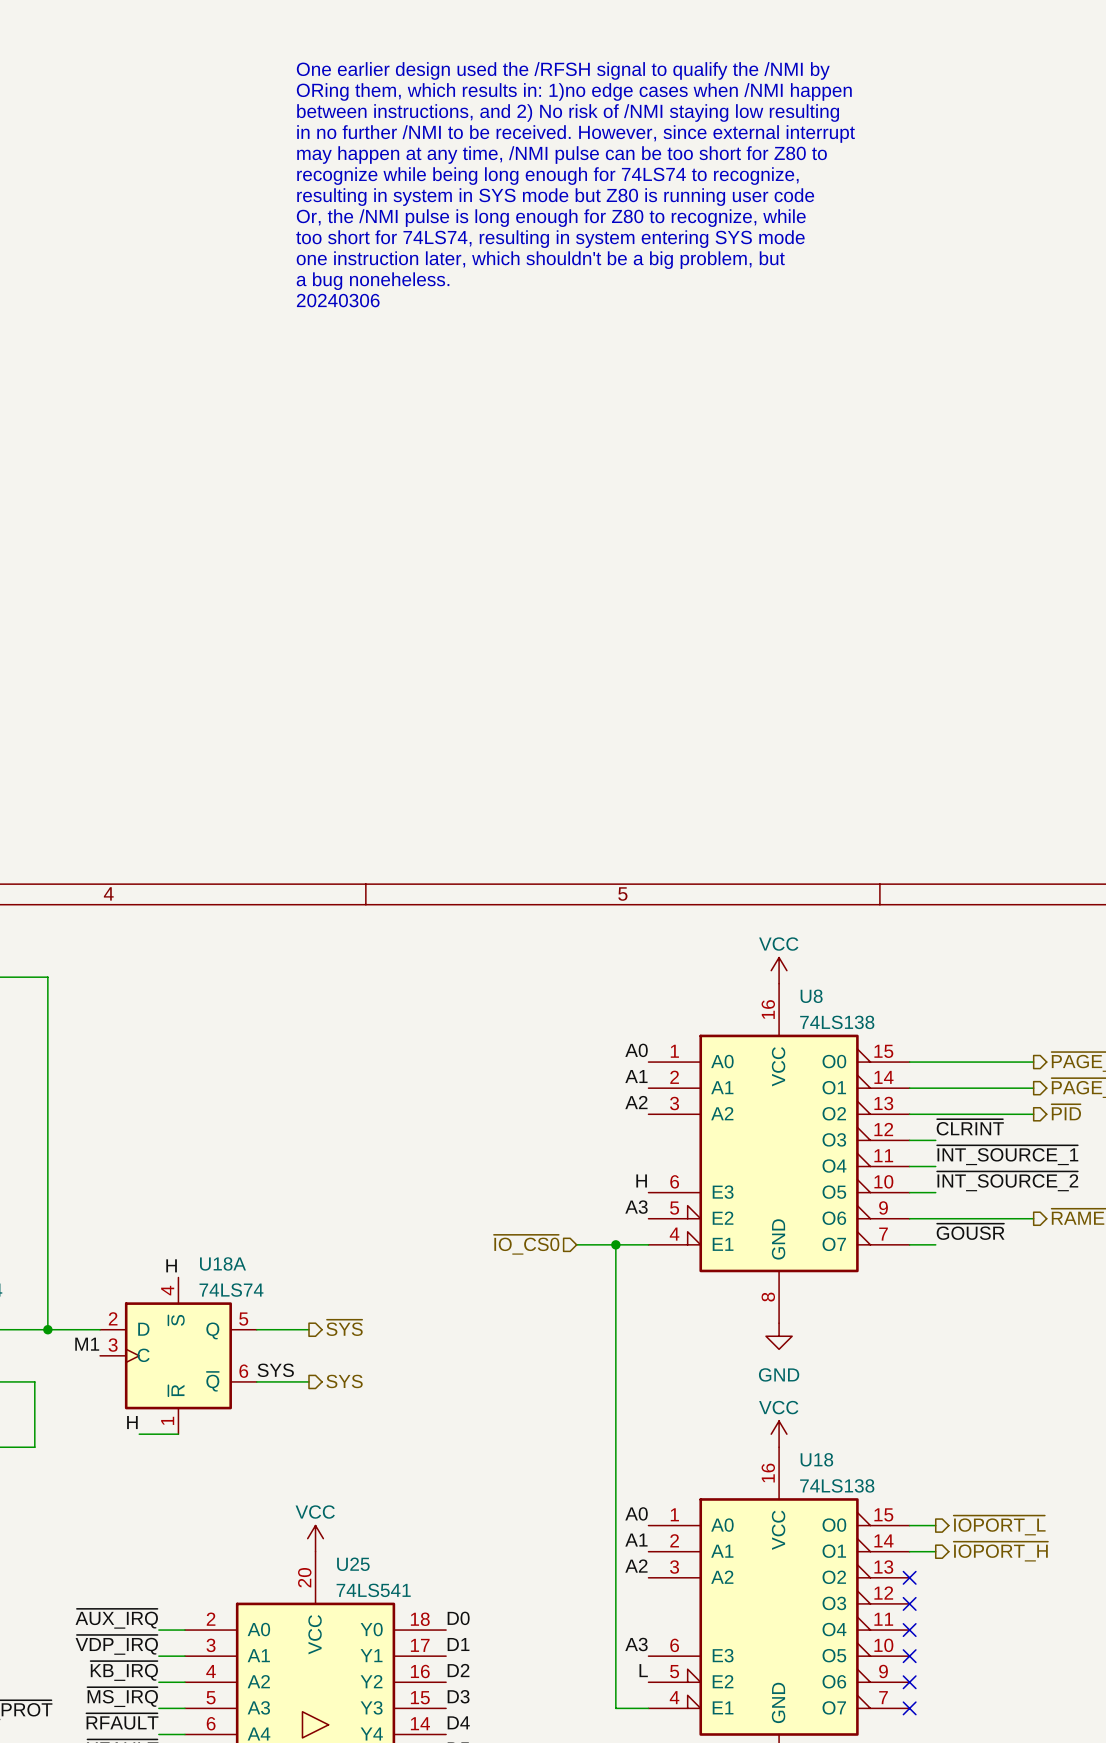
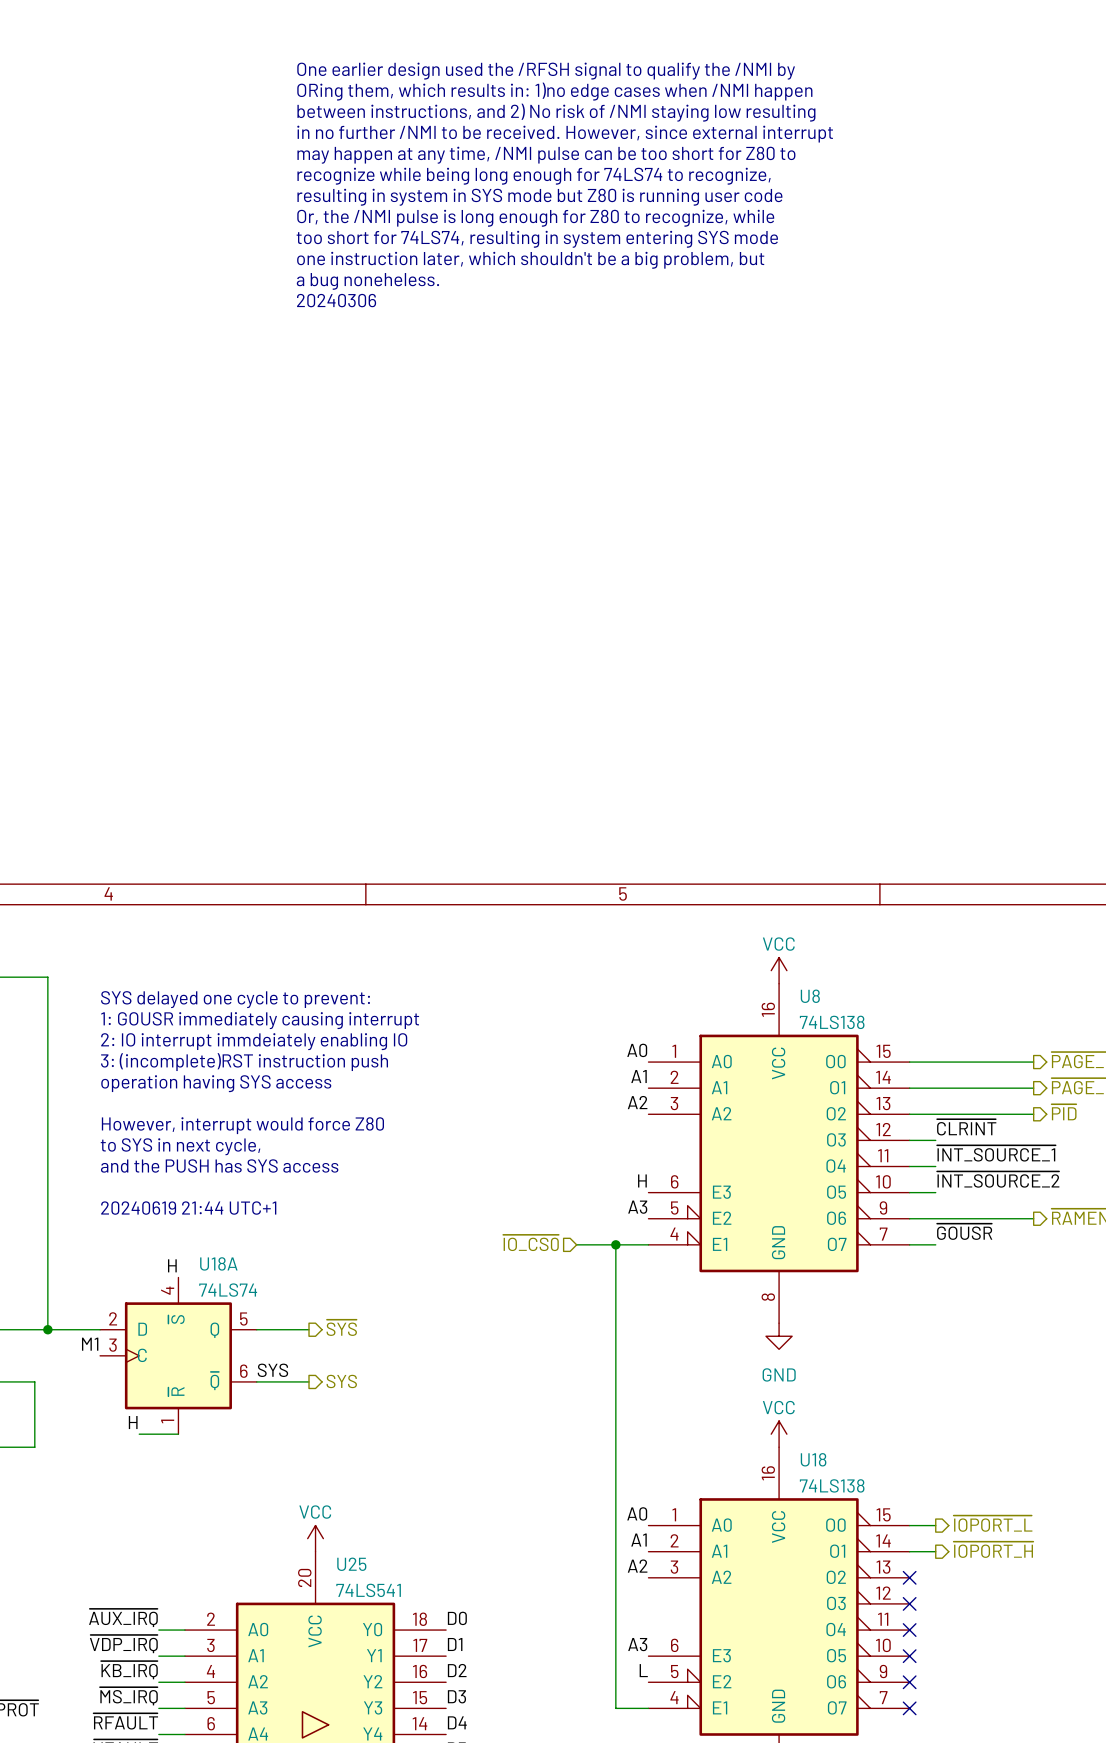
text: none -> SYS delayed one cycle to prevent: (235, 999)
text: none -> 1: GOUSR immediately causing interrupt (260, 1020)
text: none -> 2: IO interrupt immdeiately enabling IO (254, 1041)
text: none -> 3: (incomplete)RST instruction push (244, 1062)
text: none -> operation having SYS access (216, 1083)
text: none -> However, interrupt would force Z80 (242, 1125)
text: none -> to SYS in next cycle, (180, 1146)
text: none -> and the PUSH has SYS access (219, 1166)
text: none -> 20240619 21:44 UTC+1 (188, 1208)

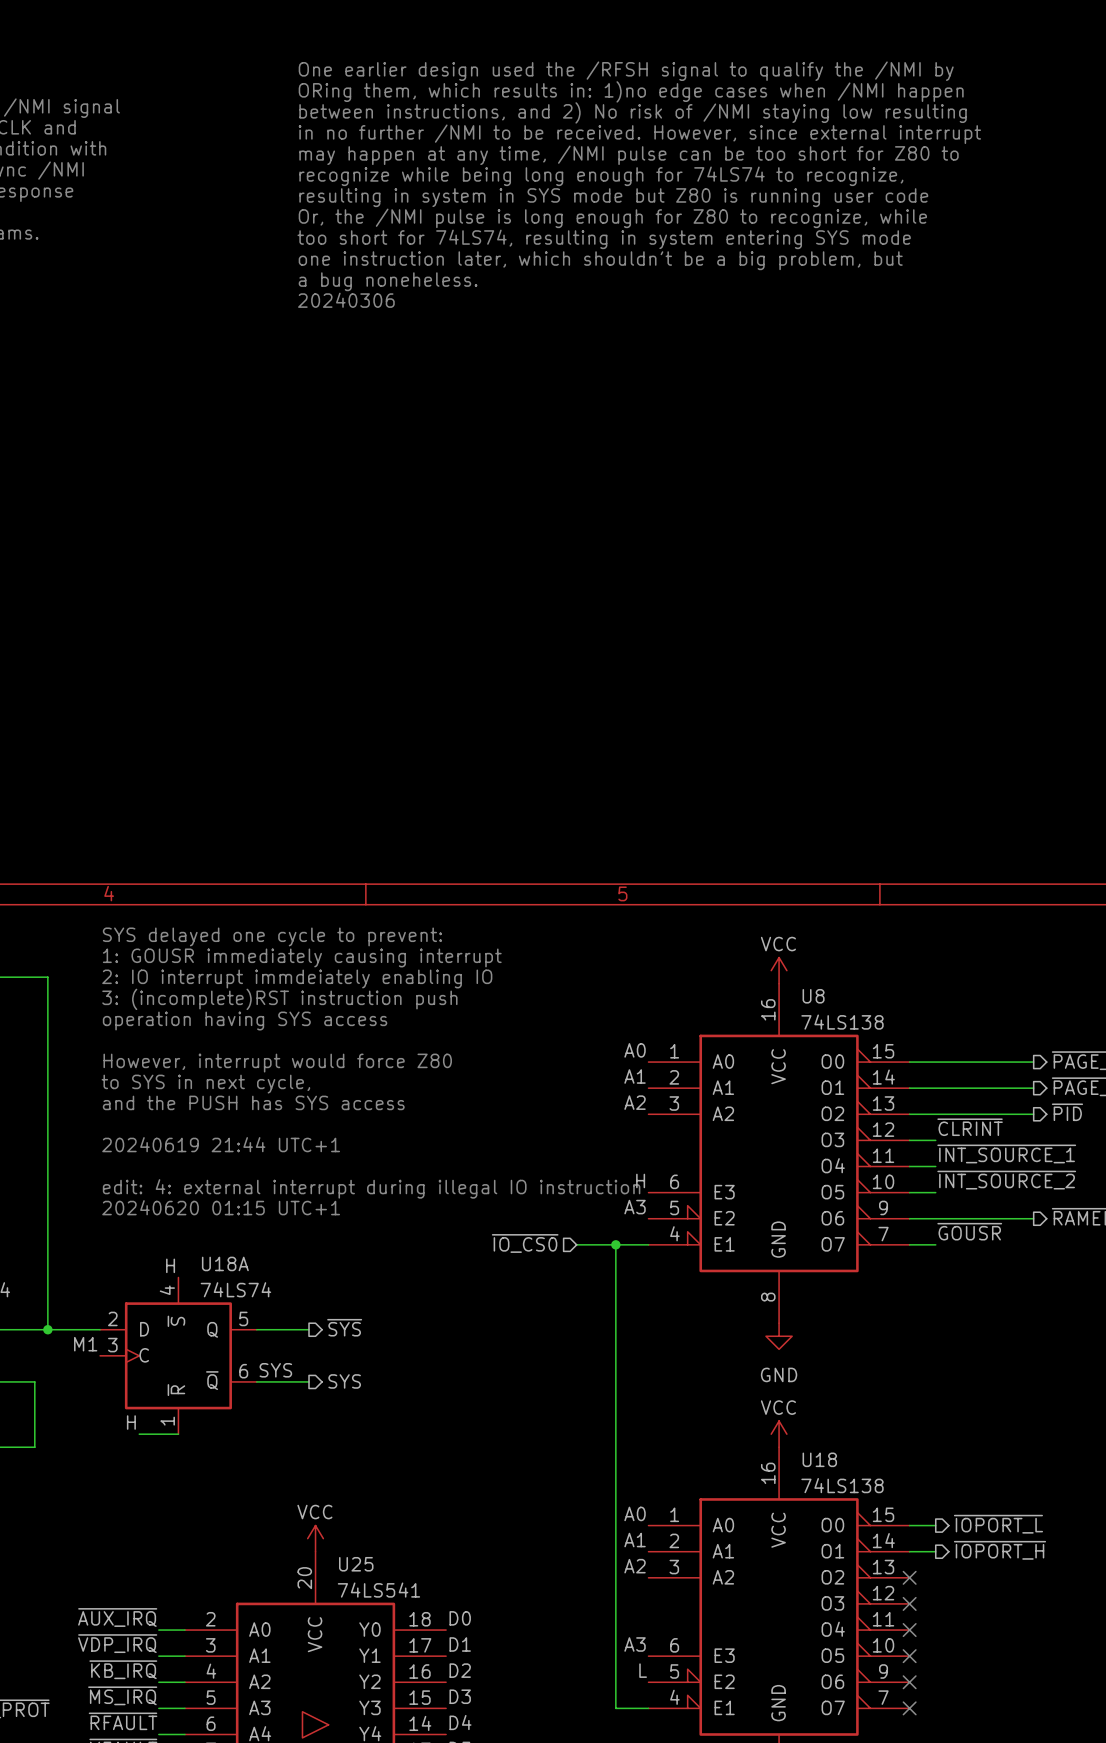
text: none -> SYS delayed one cycle to prevent: (272, 936)
text: none -> 1: GOUSR immediately causing interrupt (302, 957)
text: SYS delayed one cycle to prevent: (235, 999) -> 3: (incomplete)RST instruction push (279, 999)
text: 1: GOUSR immediately causing interrupt (260, 1020) -> operation having SYS access (245, 1021)
text position: 2: IO interrupt immdeiately enabling IO (254, 1041) -> 2: IO interrupt immdeiately enabling IO (297, 978)
text: 3: (incomplete)RST instruction push (244, 1062) -> However, interrupt would force Z80 (277, 1063)
text: operation having SYS access (216, 1083) -> to SYS in next cycle, (205, 1084)
text: However, interrupt would force Z80 (242, 1125) -> none
text: to SYS in next cycle, (180, 1146) -> 20240619 21:44 UTC+1 (221, 1144)
text position: and the PUSH has SYS access (219, 1166) -> and the PUSH has SYS access (253, 1102)
text: none -> edit: 4: external interrupt during illegal IO instruction (371, 1188)
text: 20240619 21:44 UTC+1 (188, 1208) -> 20240620 01:15 UTC+1 (221, 1207)

